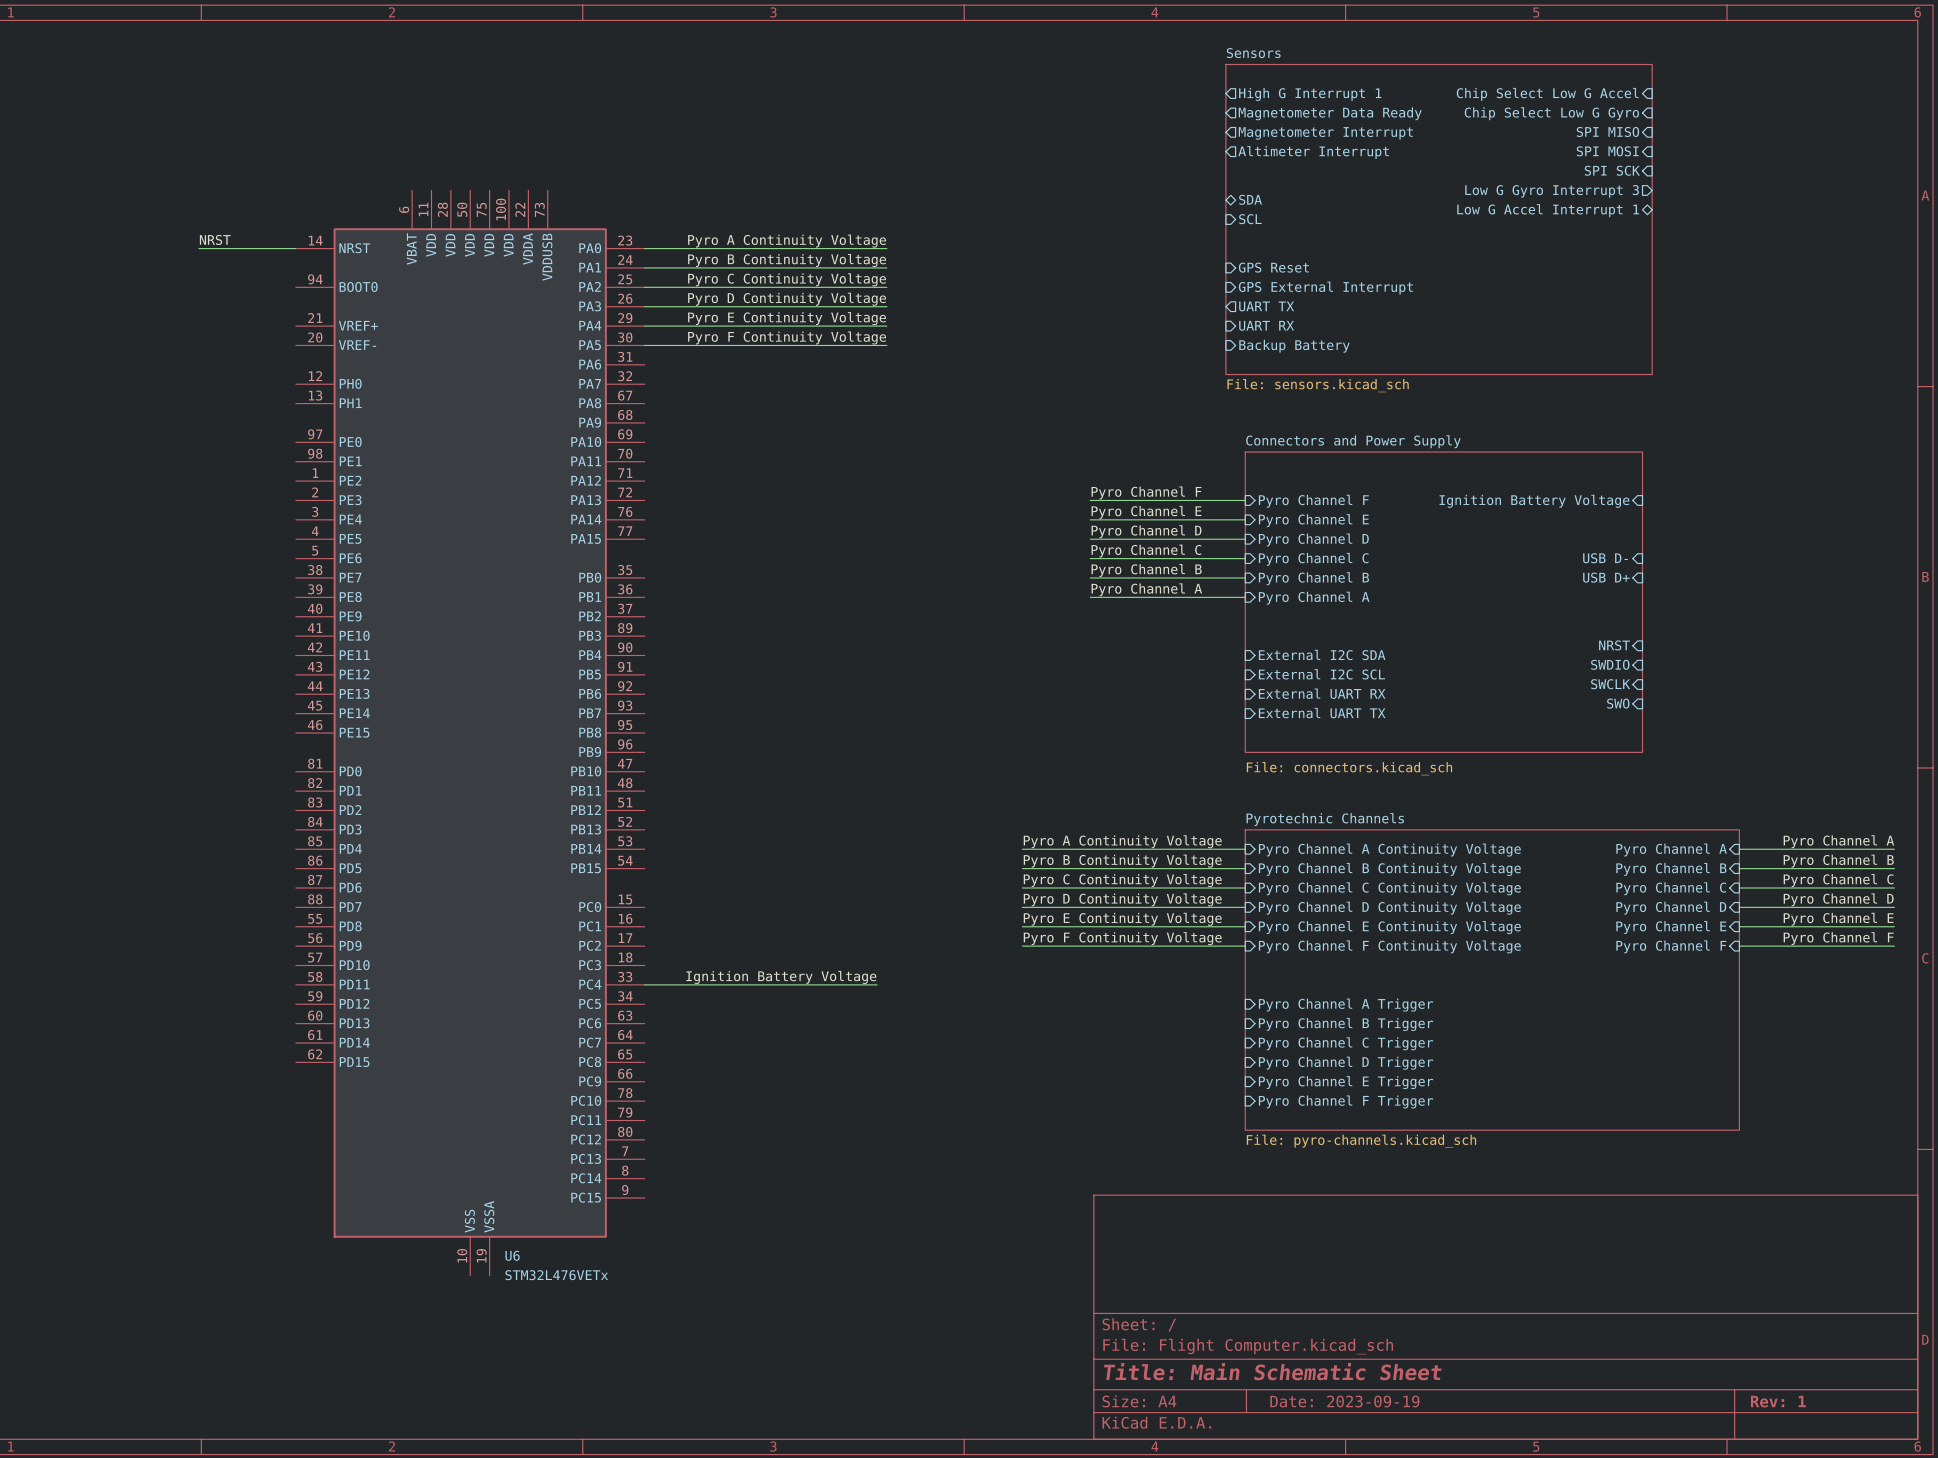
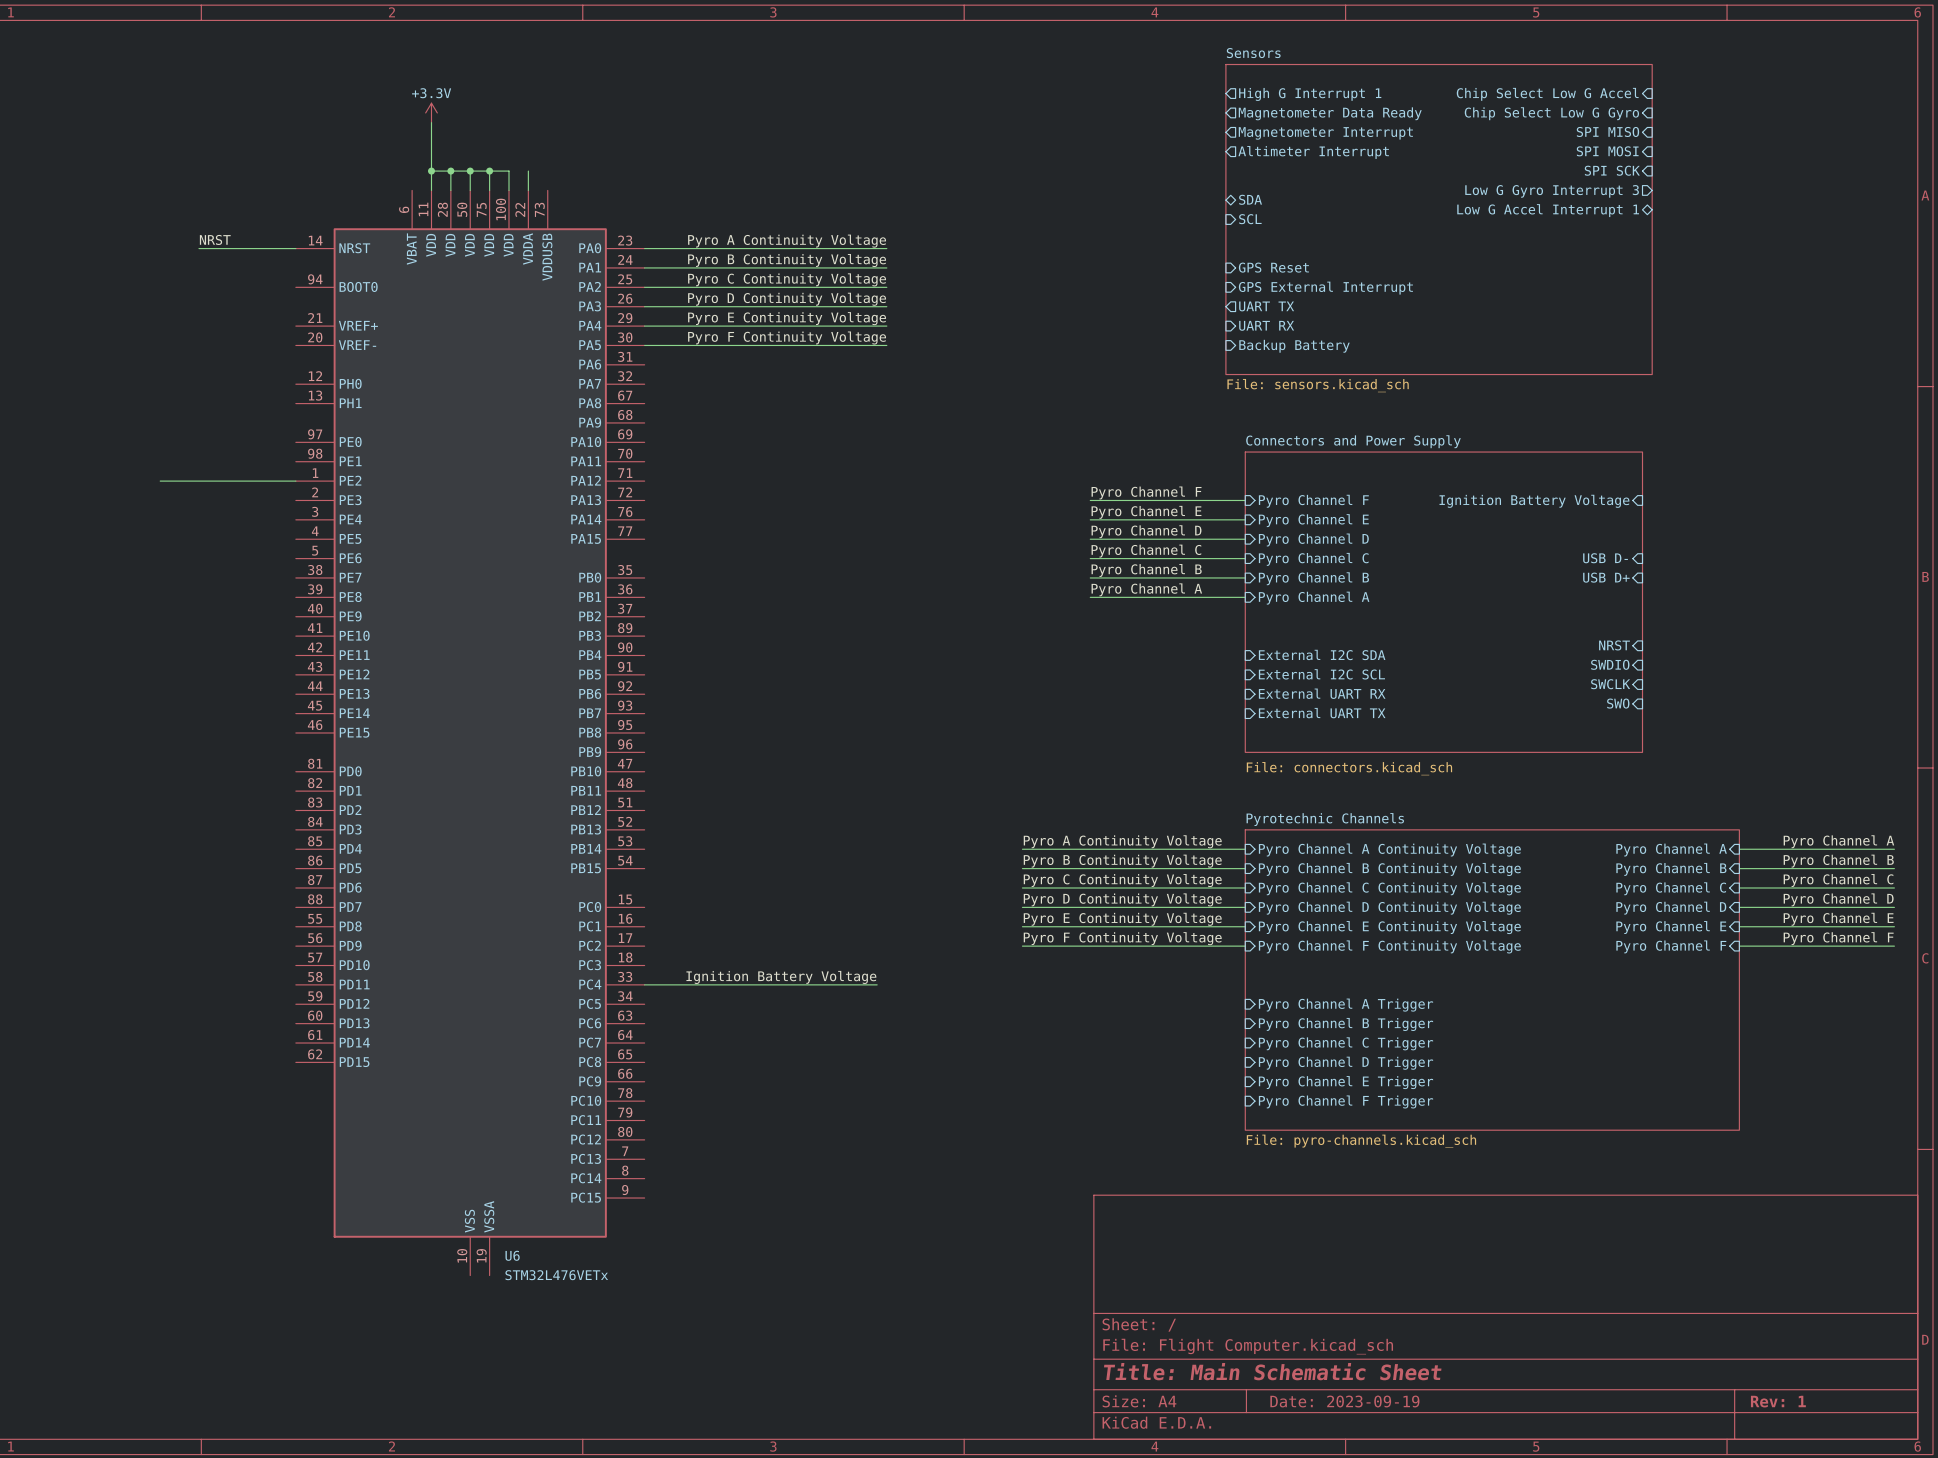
power symbol: none -> +3.3V (431, 112)
wire: none -> (431, 122) (431, 190)
wire: none -> (431, 171) (508, 171) (508, 190)
junction: none -> (431, 171)
wire: none -> (450, 171) (450, 190)
junction: none -> (450, 171)
wire: none -> (470, 171) (470, 190)
junction: none -> (470, 171)
wire: none -> (489, 171) (489, 190)
junction: none -> (489, 171)
wire: none -> (528, 171) (528, 190)
wire: none -> (160, 481) (295, 481)

